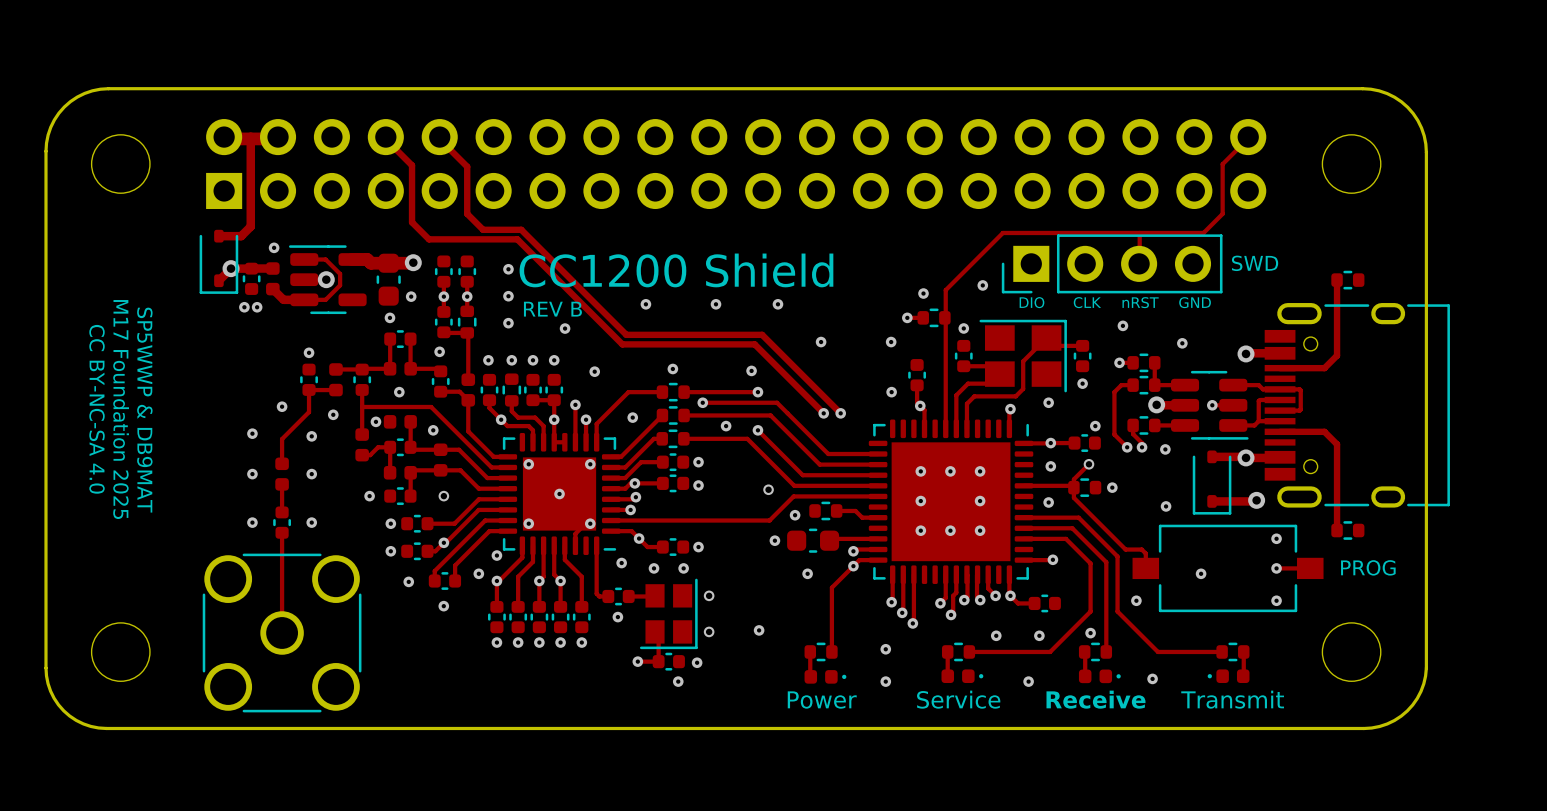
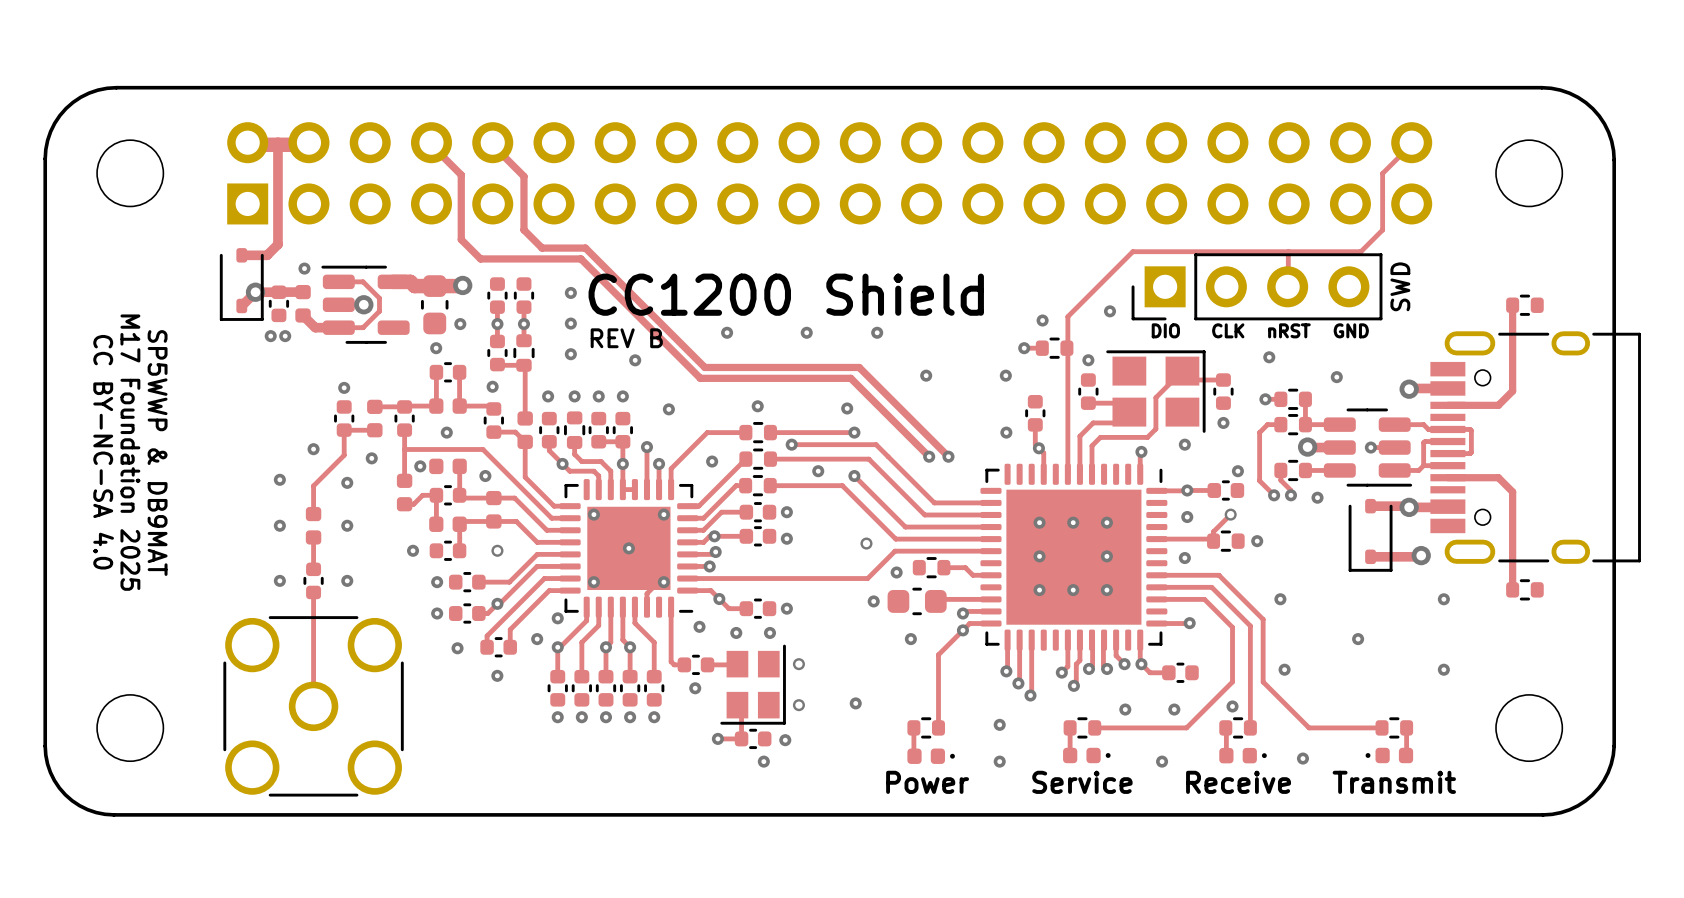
text rotation: 0° (1255, 263) -> 90° counterclockwise (1400, 286)
track: (1073, 487) (1073, 497) (1125, 549) (1141, 549) (1145, 553) (1145, 568) -> none
via position: (1166, 506) -> (1280, 599)
text: PROG (1368, 567) -> none
part: (1228, 568) -> none
track: (1276, 568) (1310, 568) -> none
via: (1276, 568) -> none

